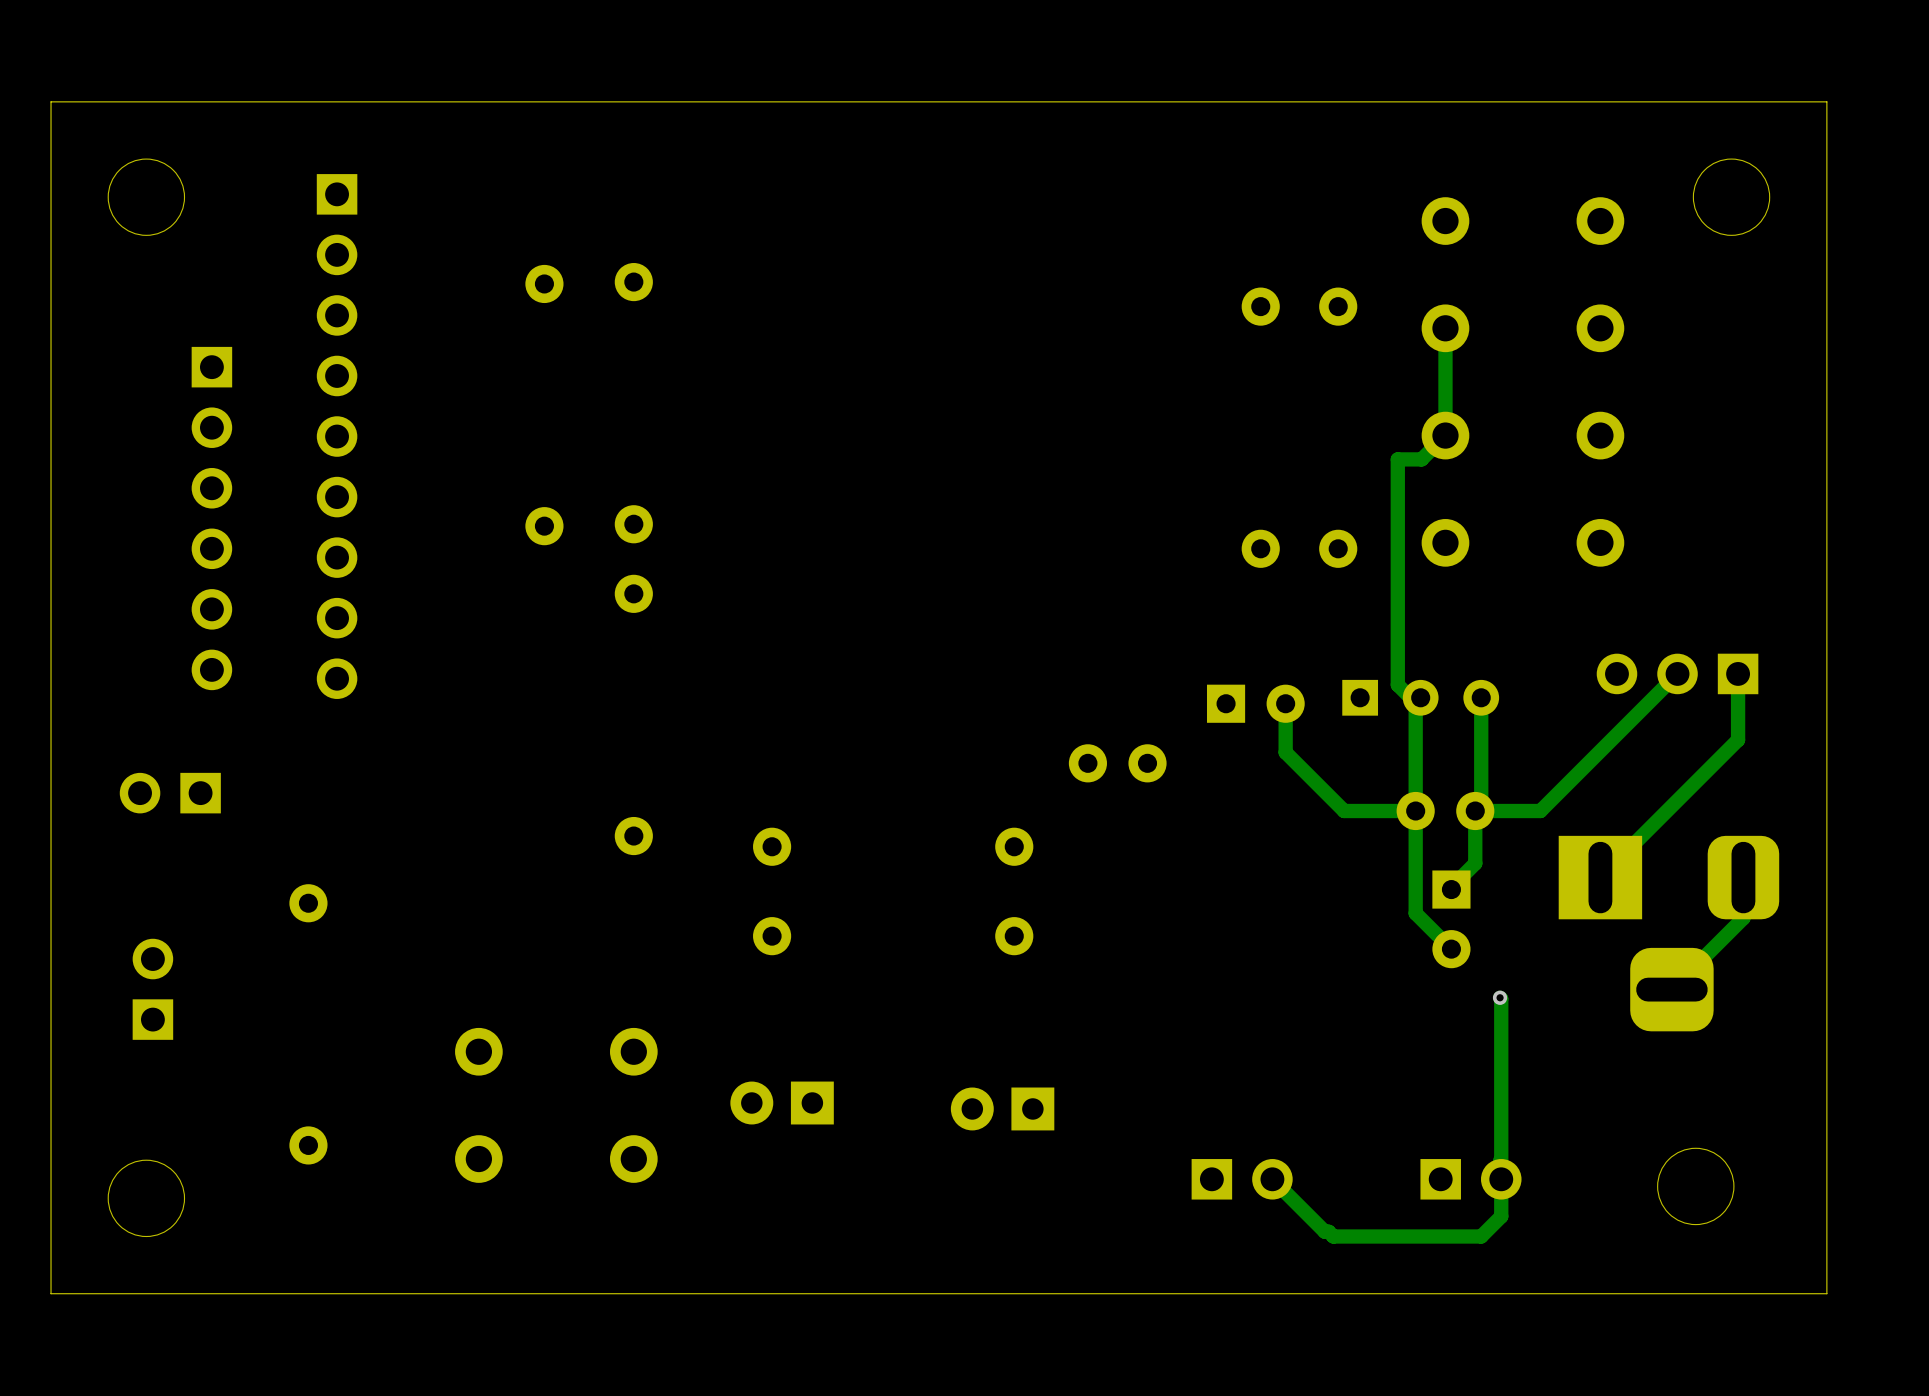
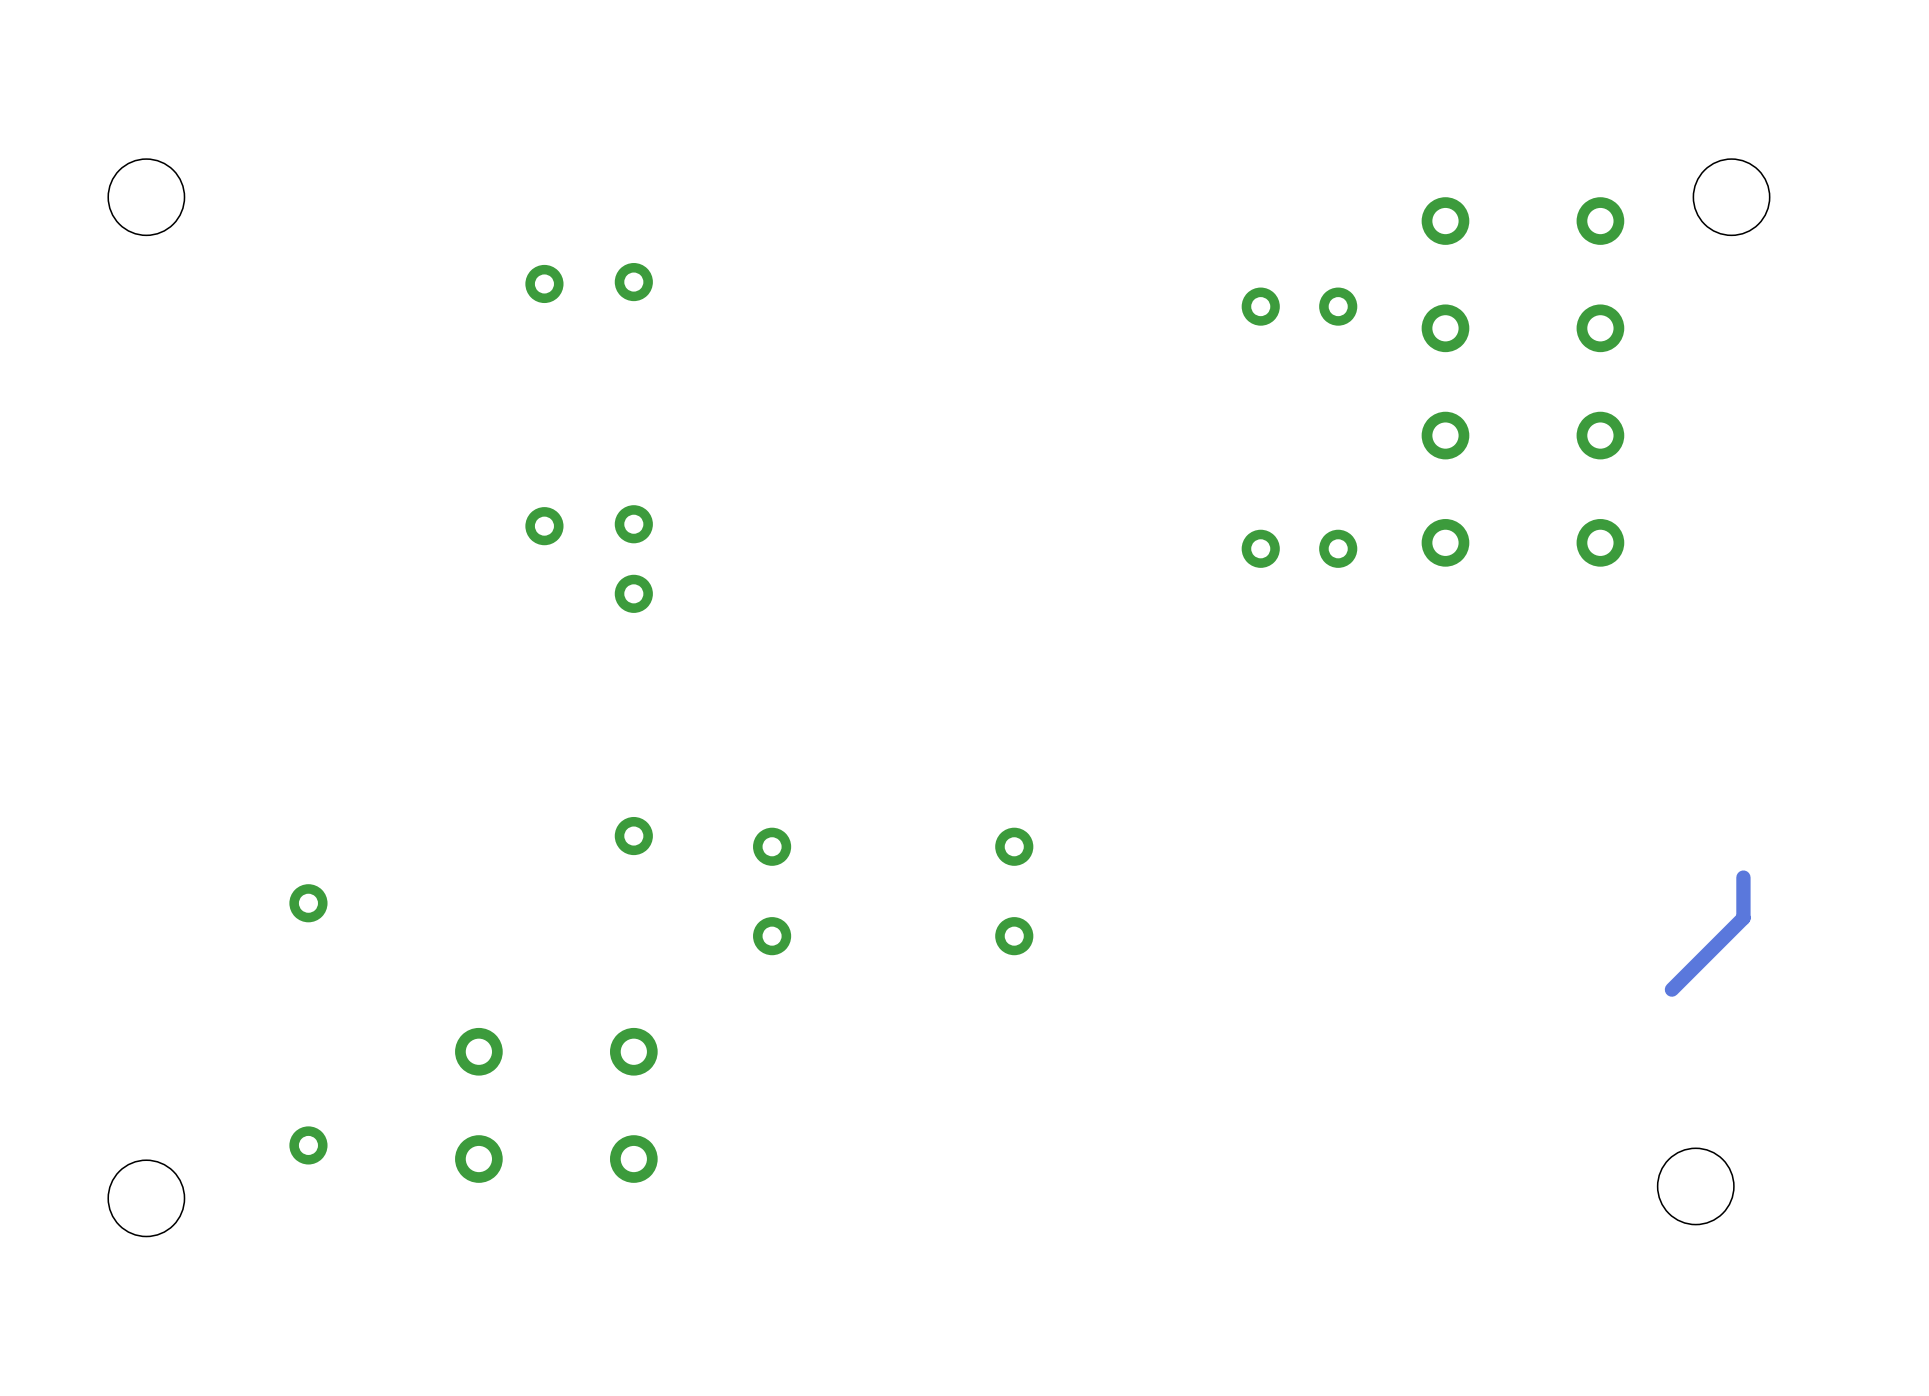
board edge: (1826, 101) (51, 101) (51, 1293) (1826, 1293) (1826, 101) -> none
track: (1445, 328) (1445, 435) (1421, 459) (1397, 459) (1397, 684) (1415, 702) (1415, 913) (1451, 949) -> none
part: (337, 436) -> none
part: (211, 518) -> none
track: (1677, 673) (1540, 811) (1475, 811) -> none
part: (1677, 673) -> none
track: (1738, 673) (1738, 739) (1600, 877) -> none
part: (1420, 697) -> none
track: (1481, 697) (1481, 805) (1475, 811) -> none
part: (1255, 703) -> none
track: (1285, 703) (1285, 752) (1344, 811) (1415, 811) -> none
part: (1117, 763) -> none
part: (170, 793) -> none
part: (1445, 811) -> none
track: (1475, 811) (1475, 863) (1451, 887) (1451, 889) -> none
part: (1451, 919) -> none
part: (1668, 933) -> none
part: (152, 989) -> none
track: (1500, 997) (1501, 1216) (1481, 1236) (1333, 1236) (1328, 1231) (1324, 1231) (1272, 1179) -> none
via: (1500, 997) -> none
part: (782, 1103) -> none
part: (1002, 1108) -> none
part: (1242, 1179) -> none
part: (1470, 1179) -> none

